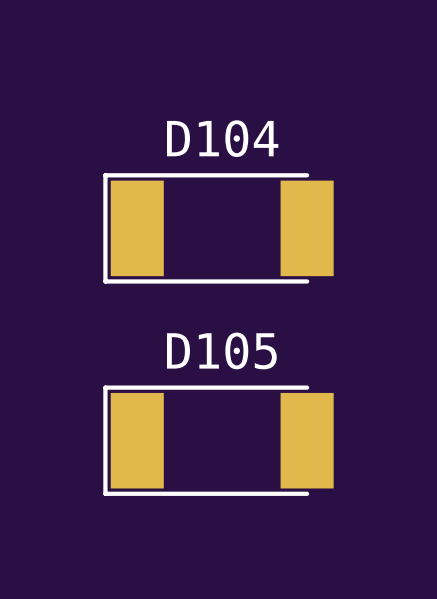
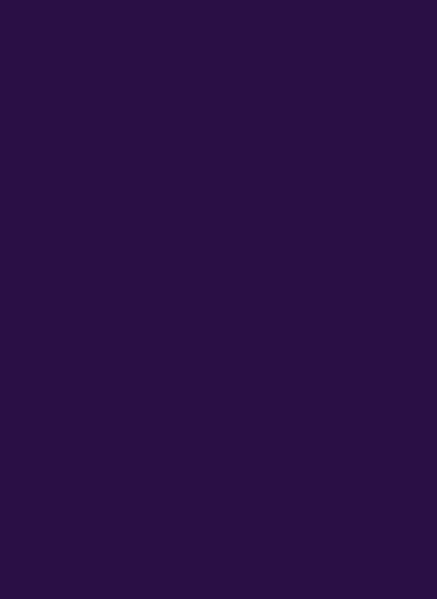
D104: (218, 228) -> none
D105: (218, 440) -> none

